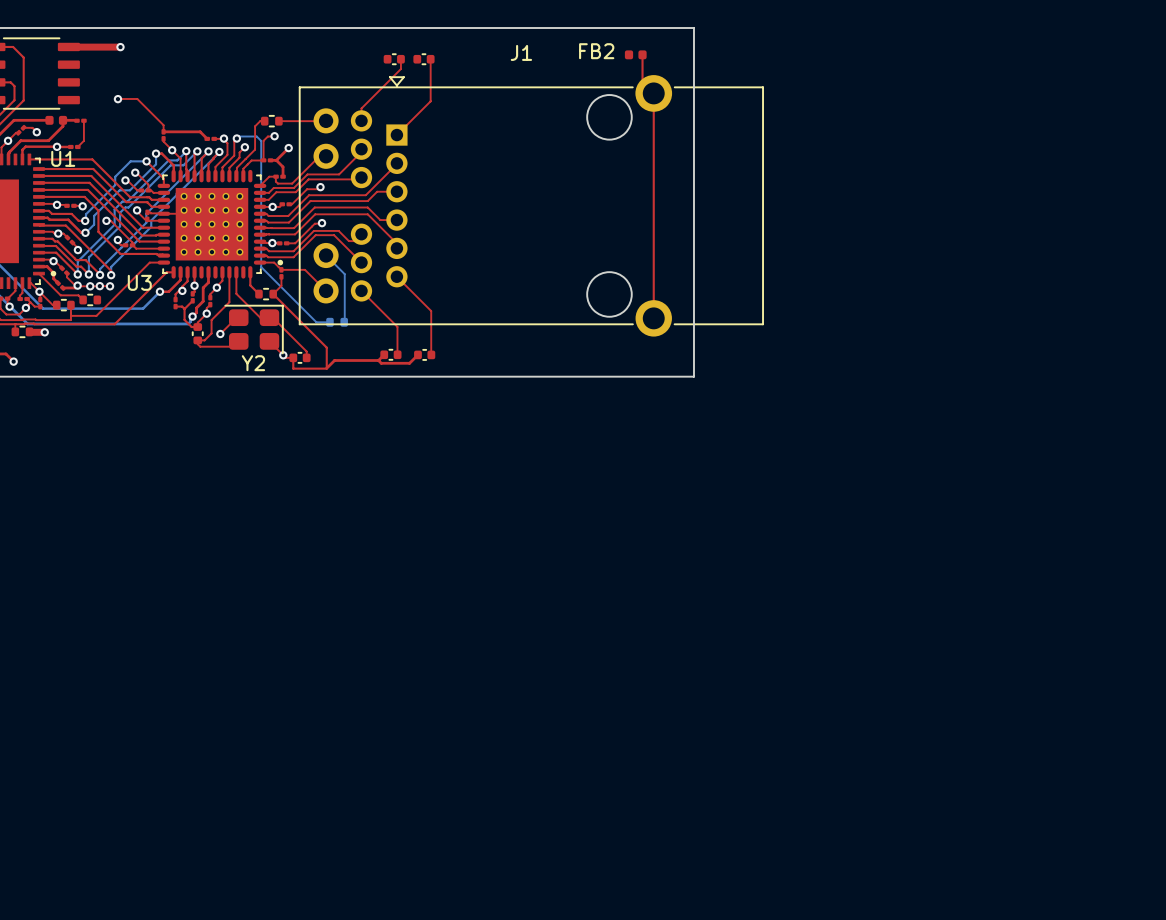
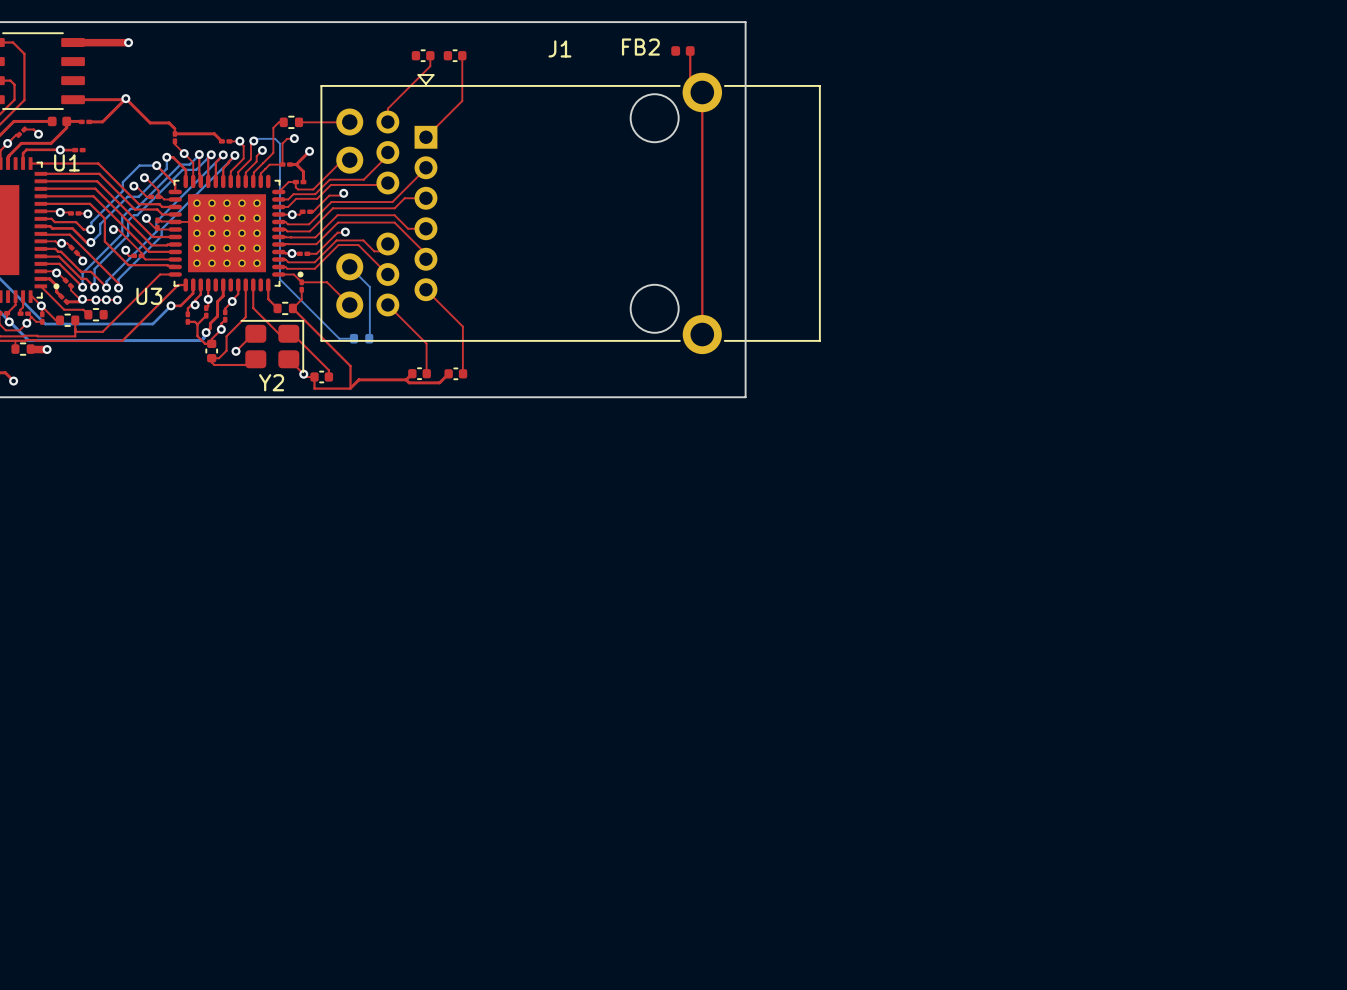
top track: (118, 98) (137, 98) (163, 127) -> (89, 121) (102, 121) (125, 98) (150, 122) (169, 122) (174, 128)
top track: none -> (73, 99) (124, 99)
top track: (83, 120) (83, 140) (77, 146) -> none

